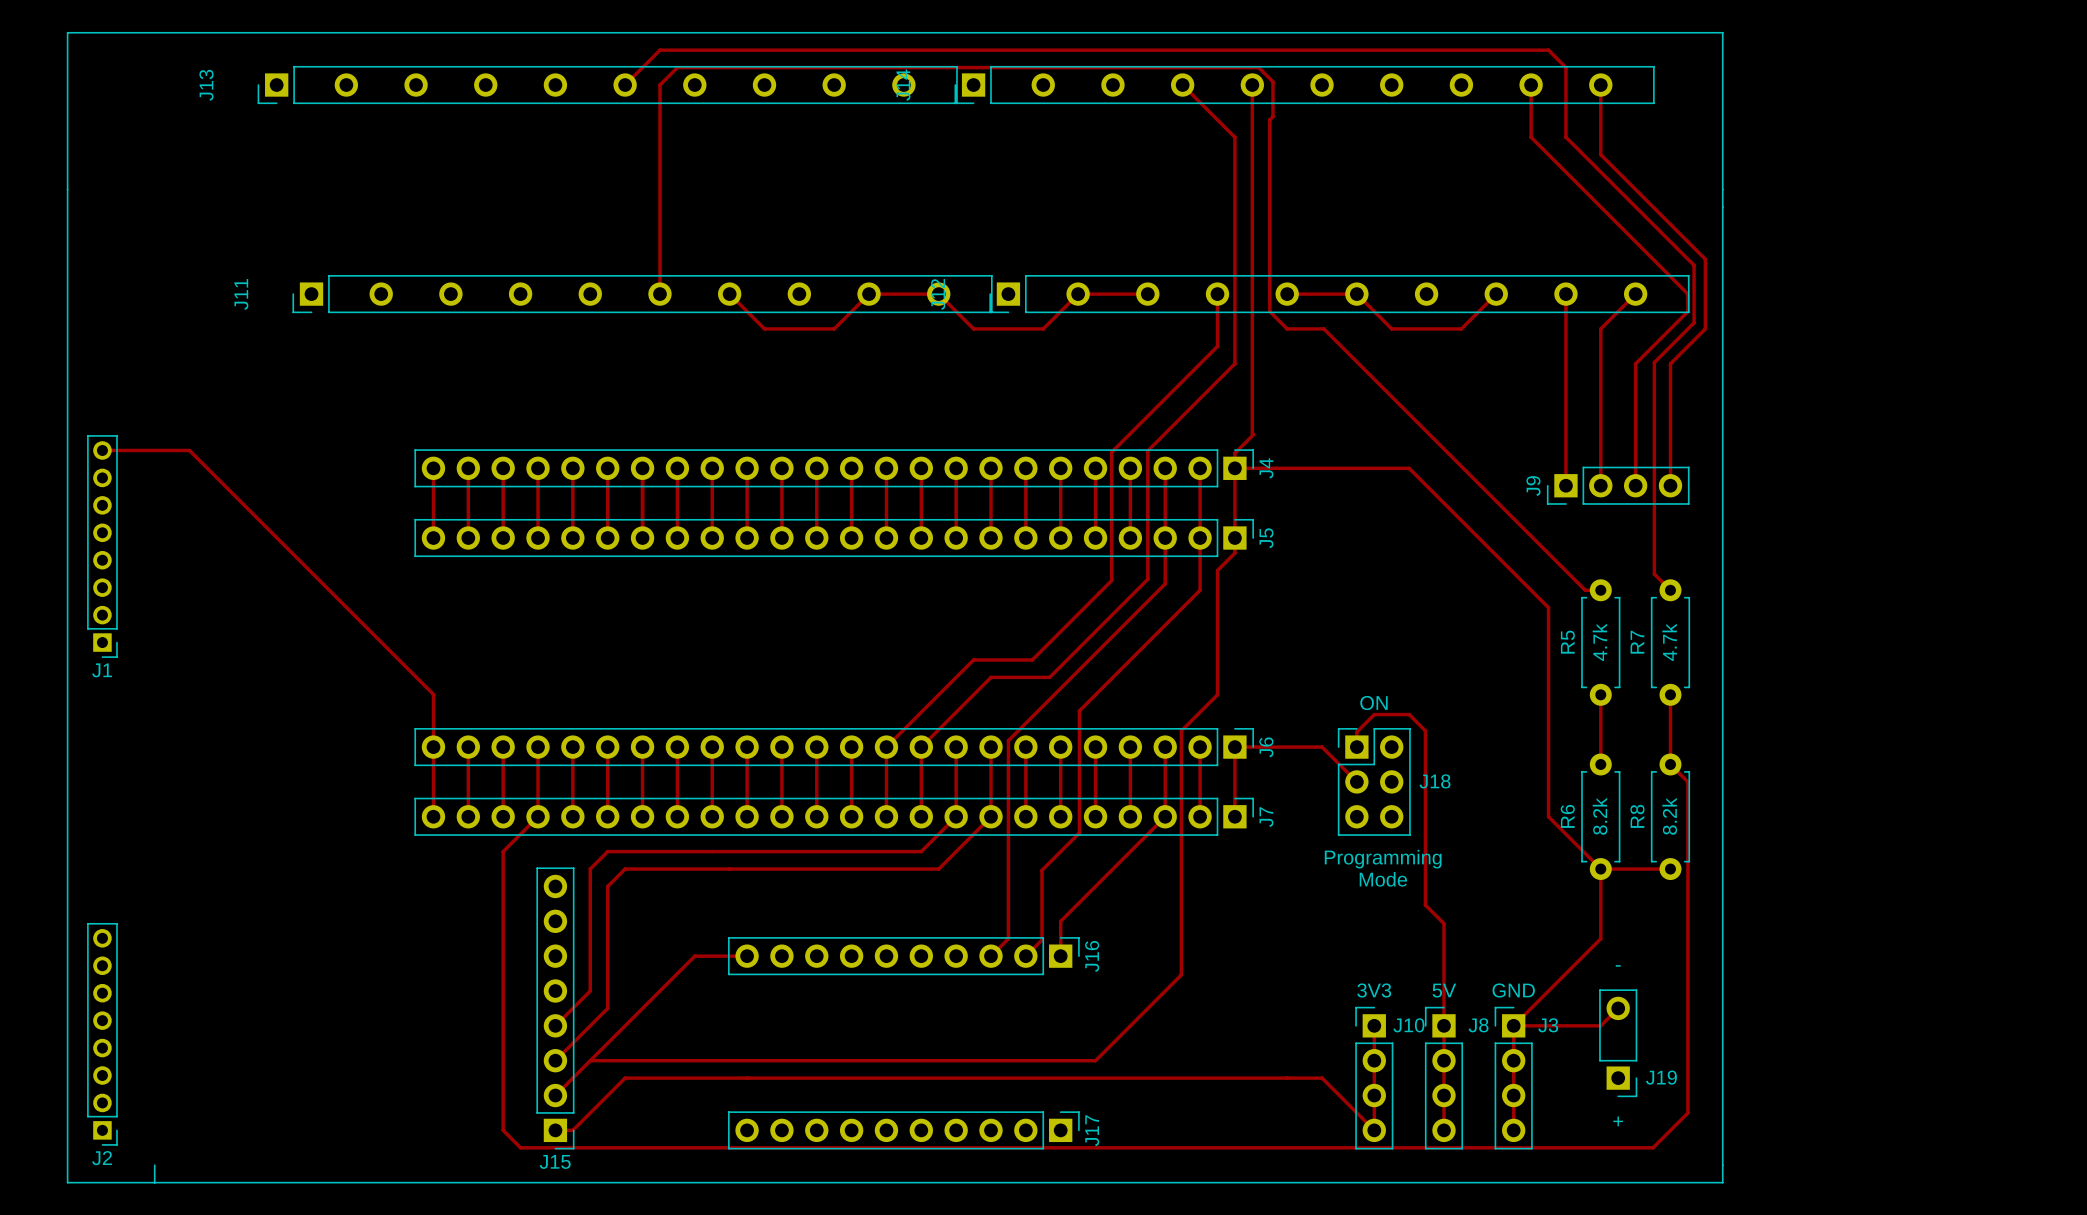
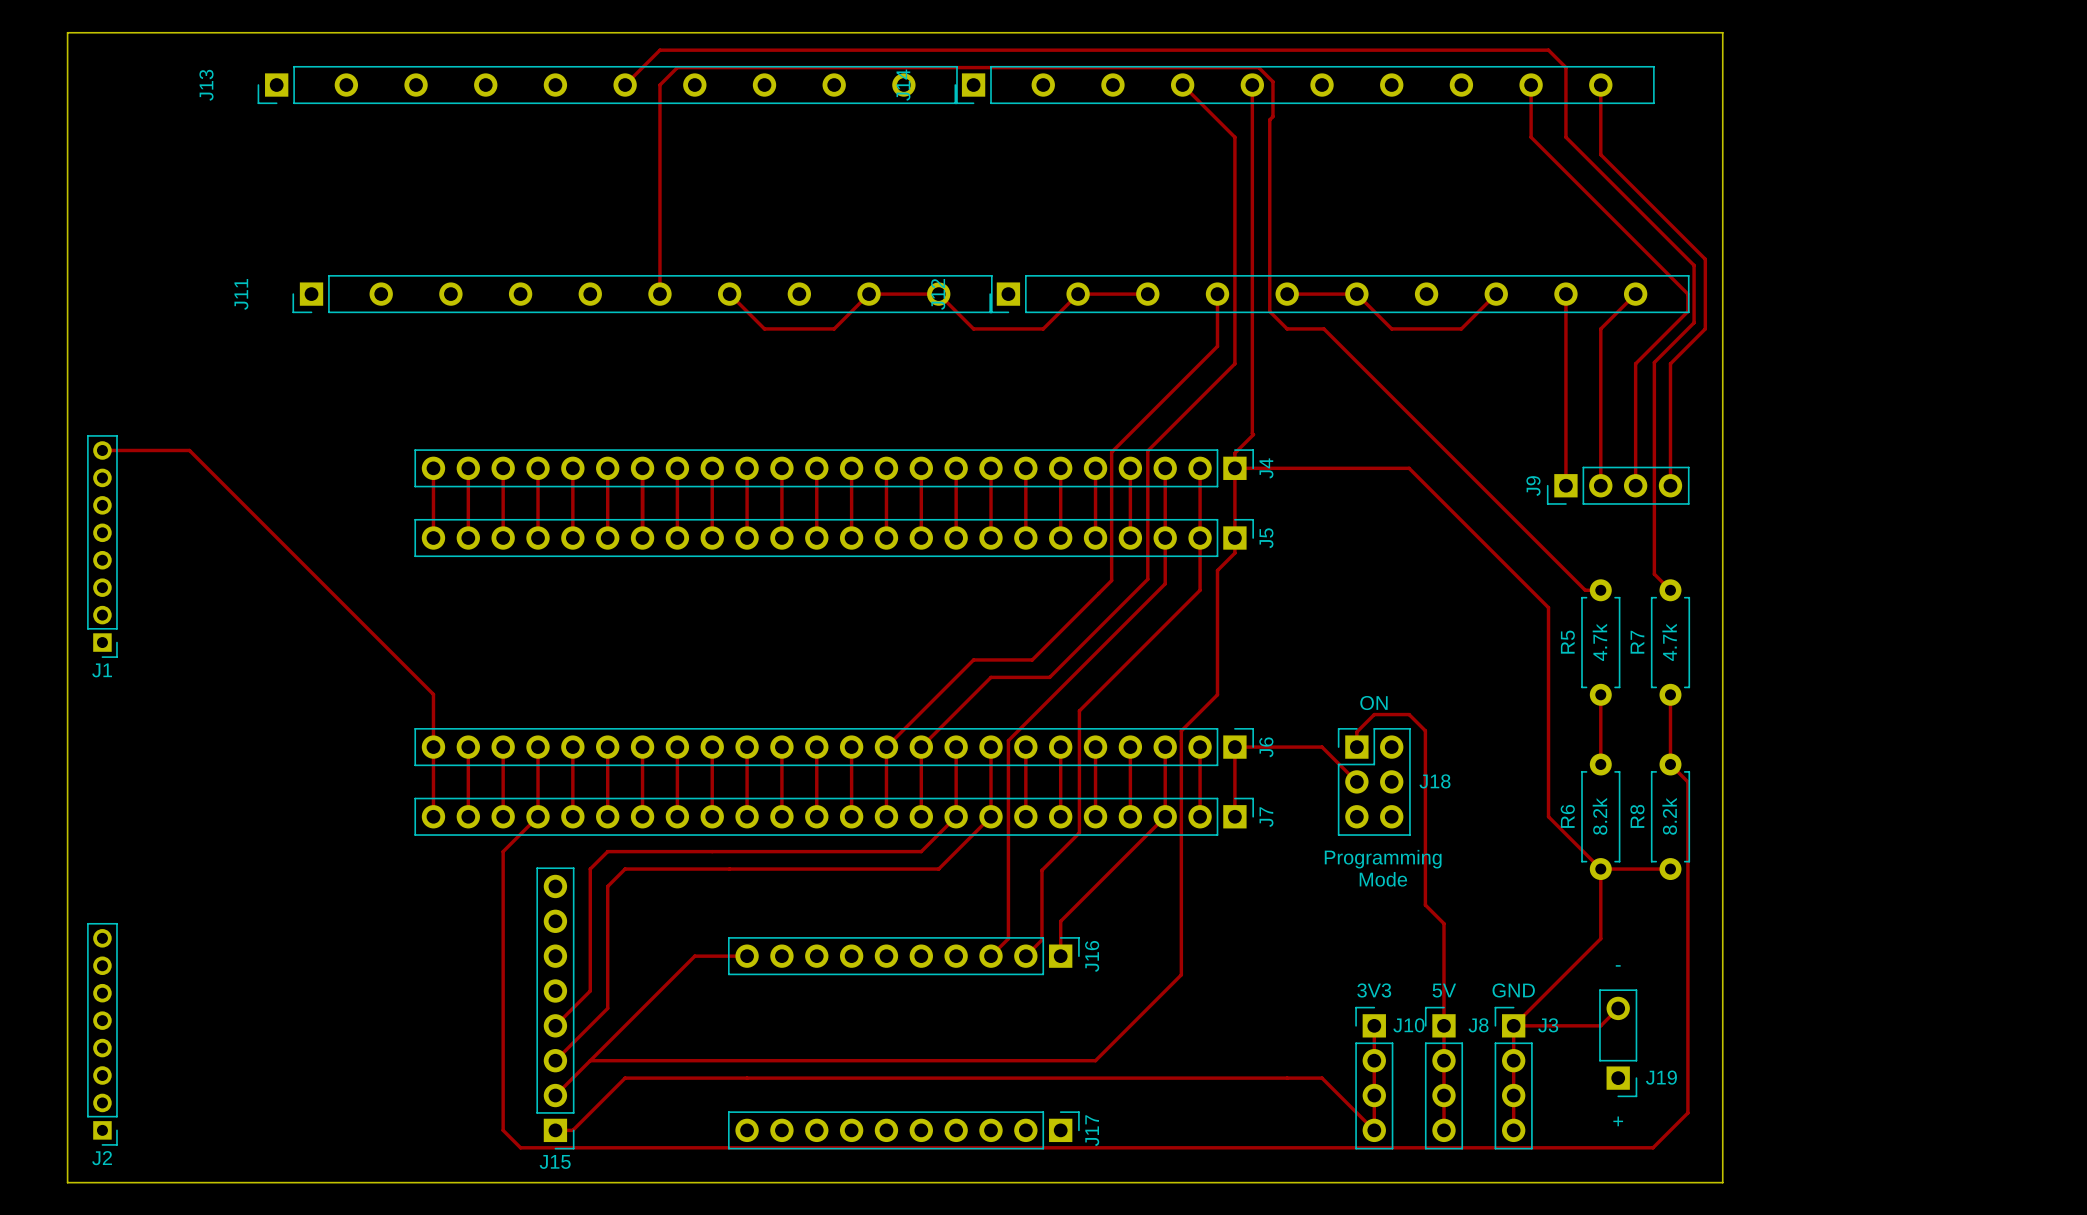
line: (67, 32) (1722, 32) (1722, 1182) (67, 1182) (67, 32) -> none
board edge: none -> (67, 32) (1722, 32) (1722, 1182) (67, 1182) (67, 32)
line: (154, 1165) (154, 1182) -> none

